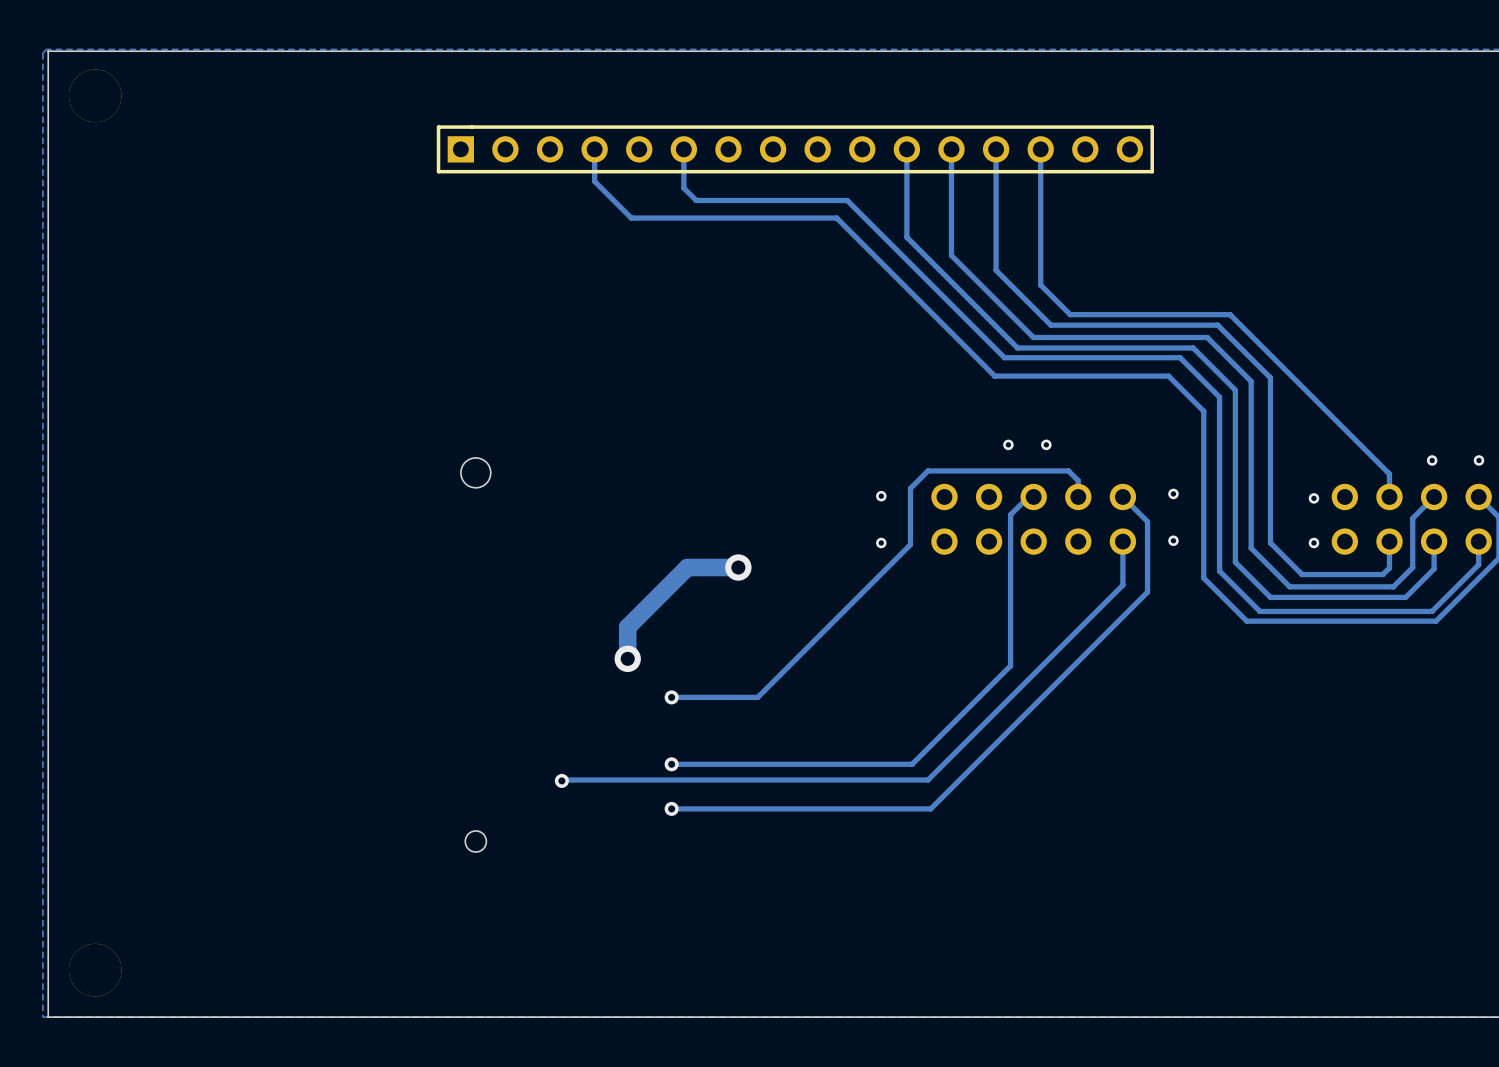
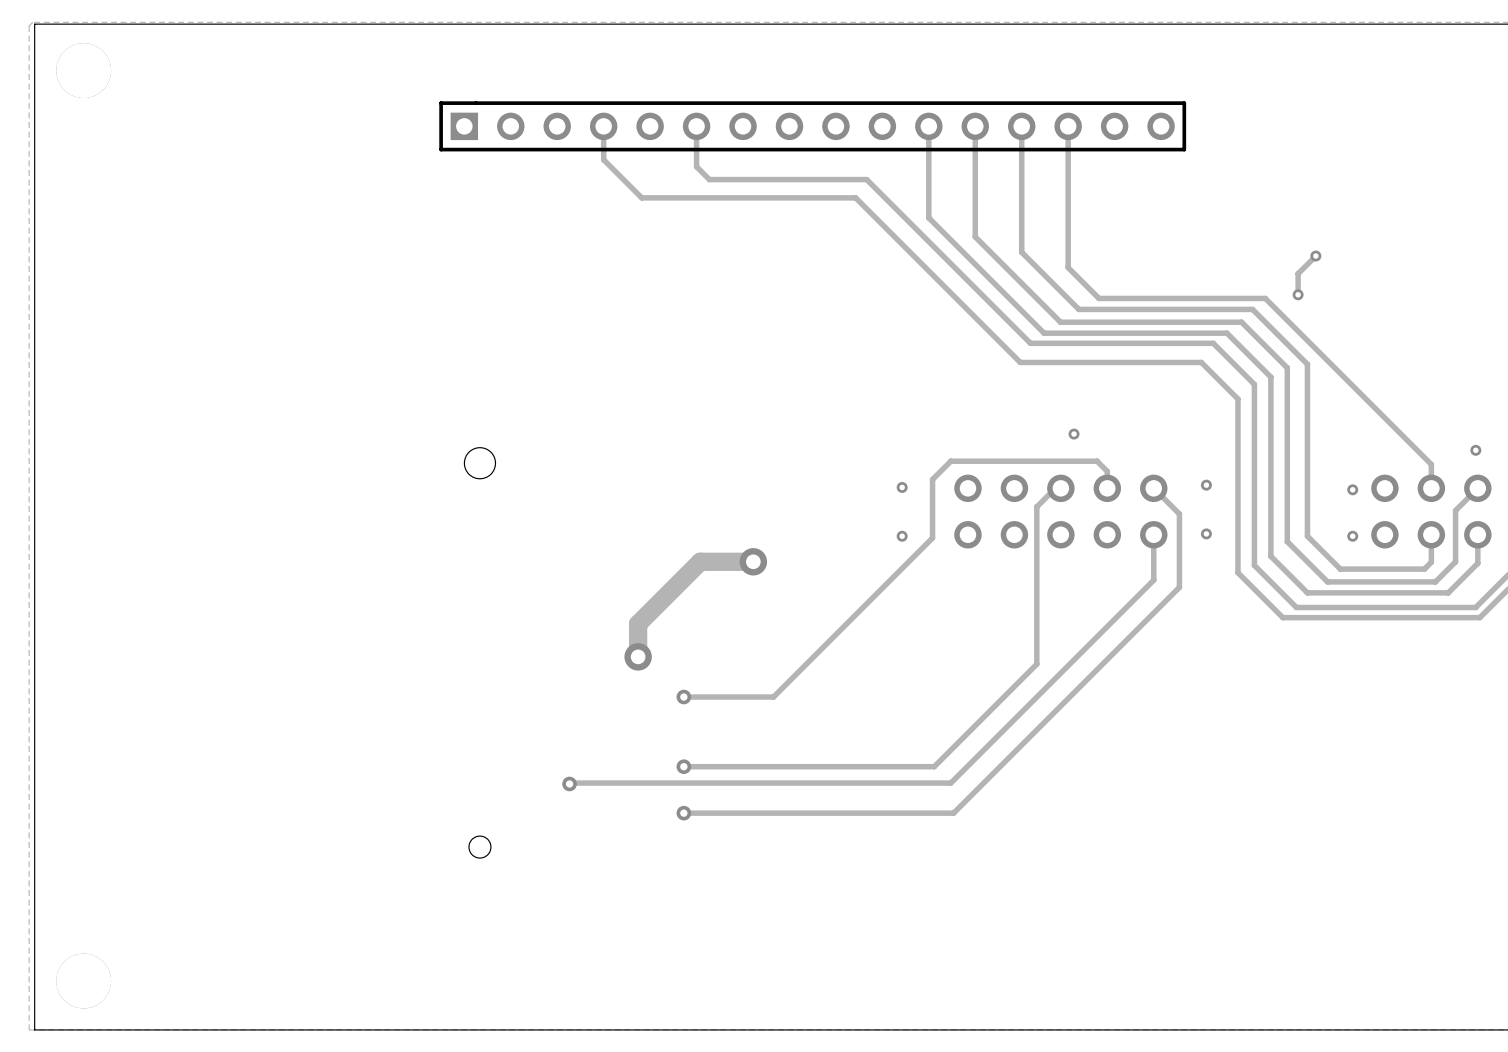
track: none -> (1315, 256) (1298, 273) (1298, 294)
via: none -> (1315, 256)
via: none -> (1298, 294)
via: (1008, 444) -> none

